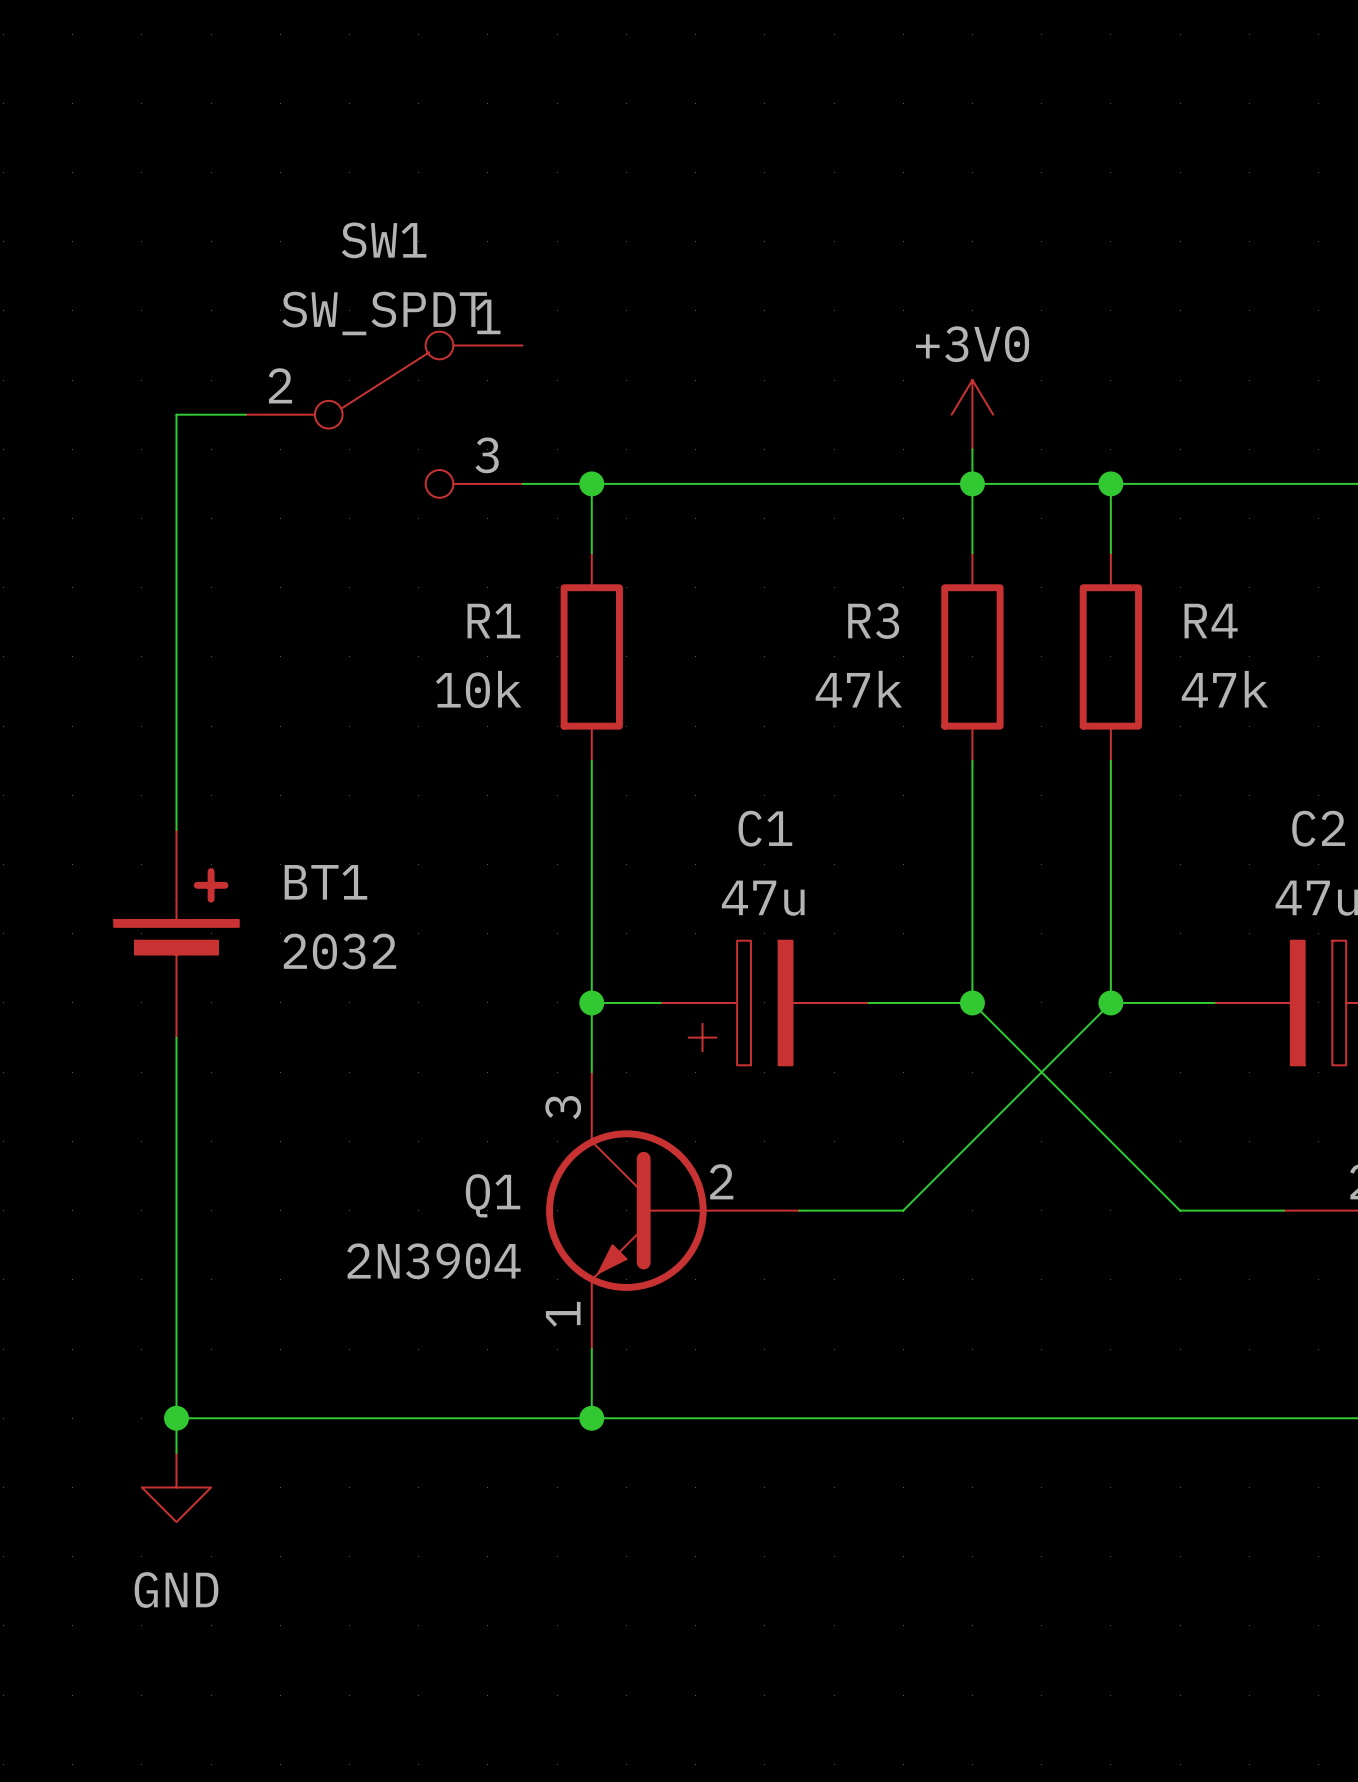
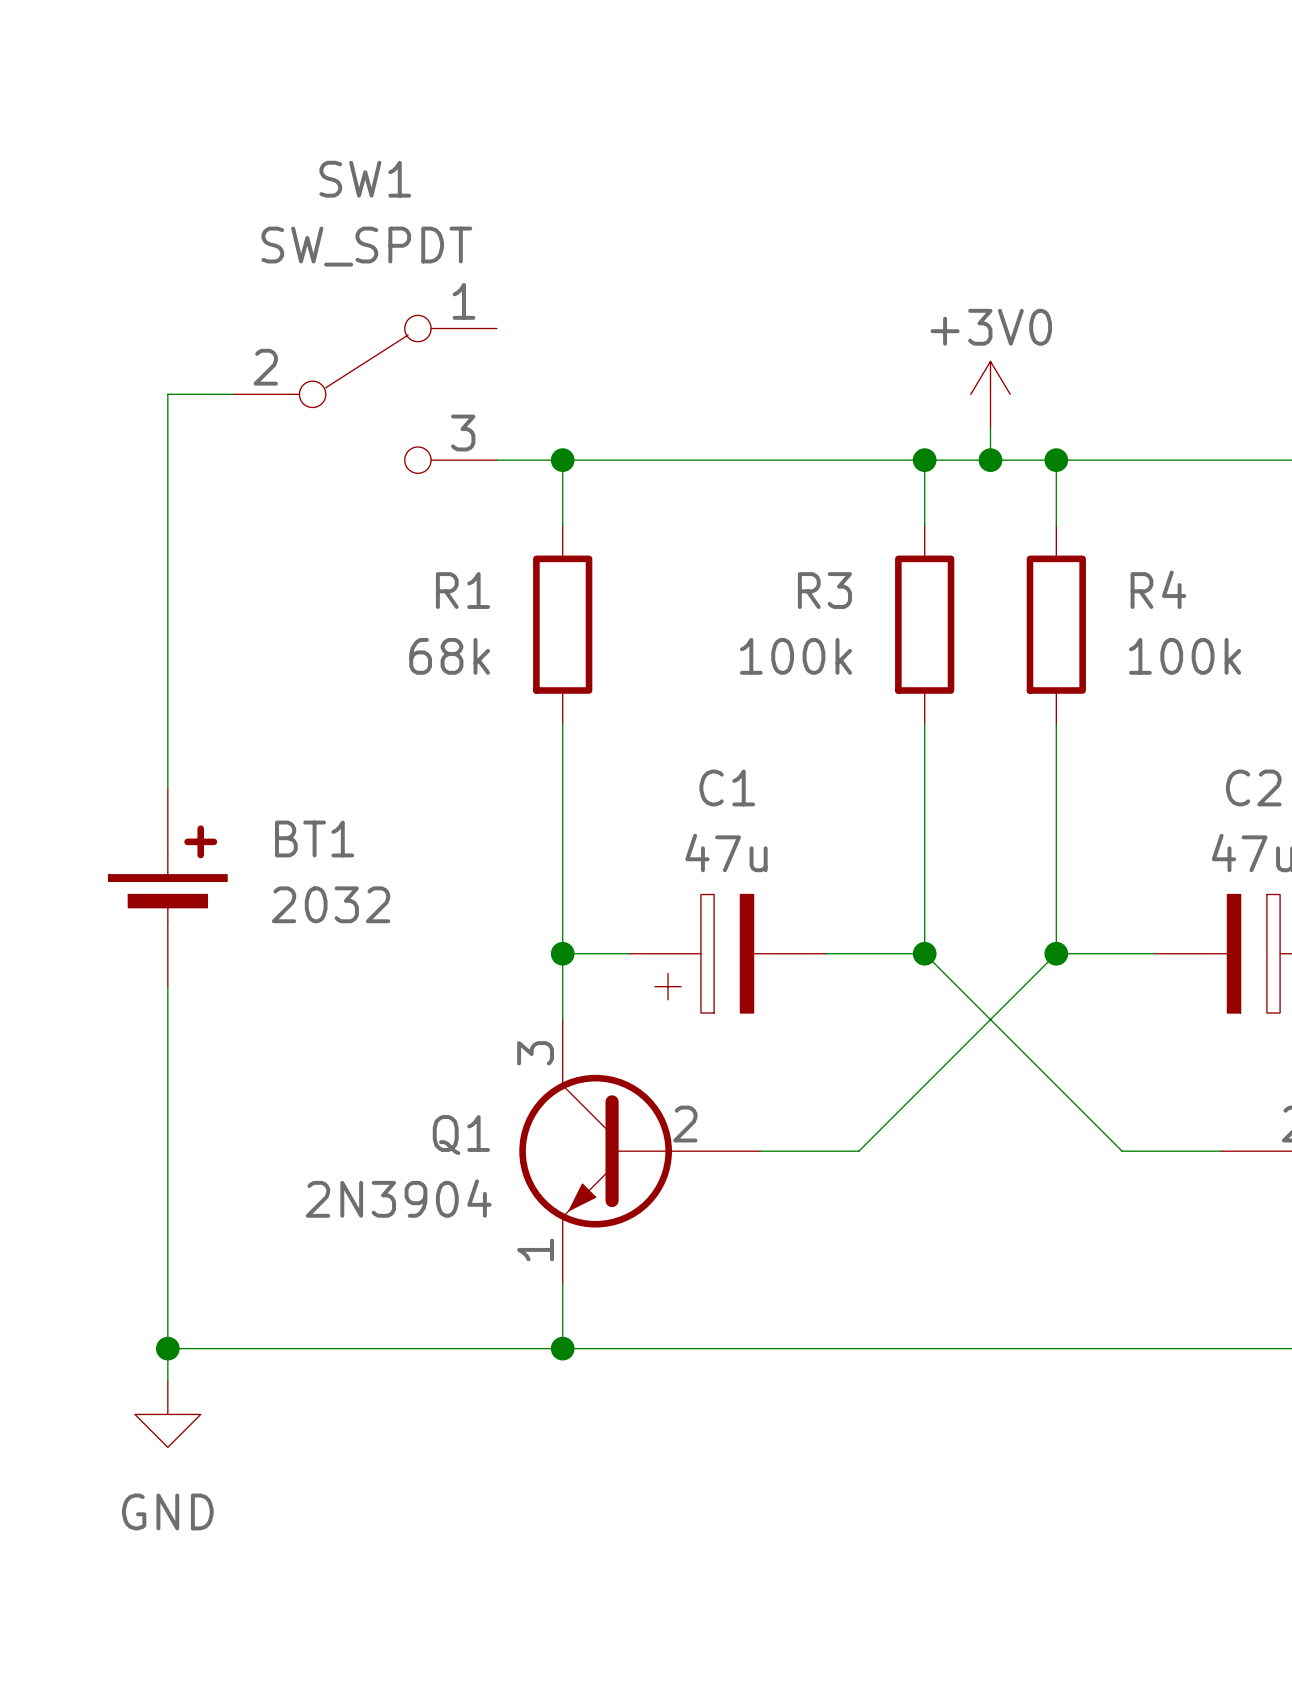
SW1 name position: SW1 (384, 240) -> SW1 (365, 179)
SW1 value position: SW_SPDT (384, 313) -> SW_SPDT (366, 246)
power symbol position: +3V0 (972, 414) -> +3V0 (990, 394)
wire: (972, 449) (972, 483) -> (990, 427) (990, 460)
junction: none -> (990, 460)
R1 value: 10k (478, 689) -> 68k (449, 656)
R3 value: 47k (858, 689) -> 100k (795, 656)
R4 value: 47k (1224, 689) -> 100k (1185, 656)

